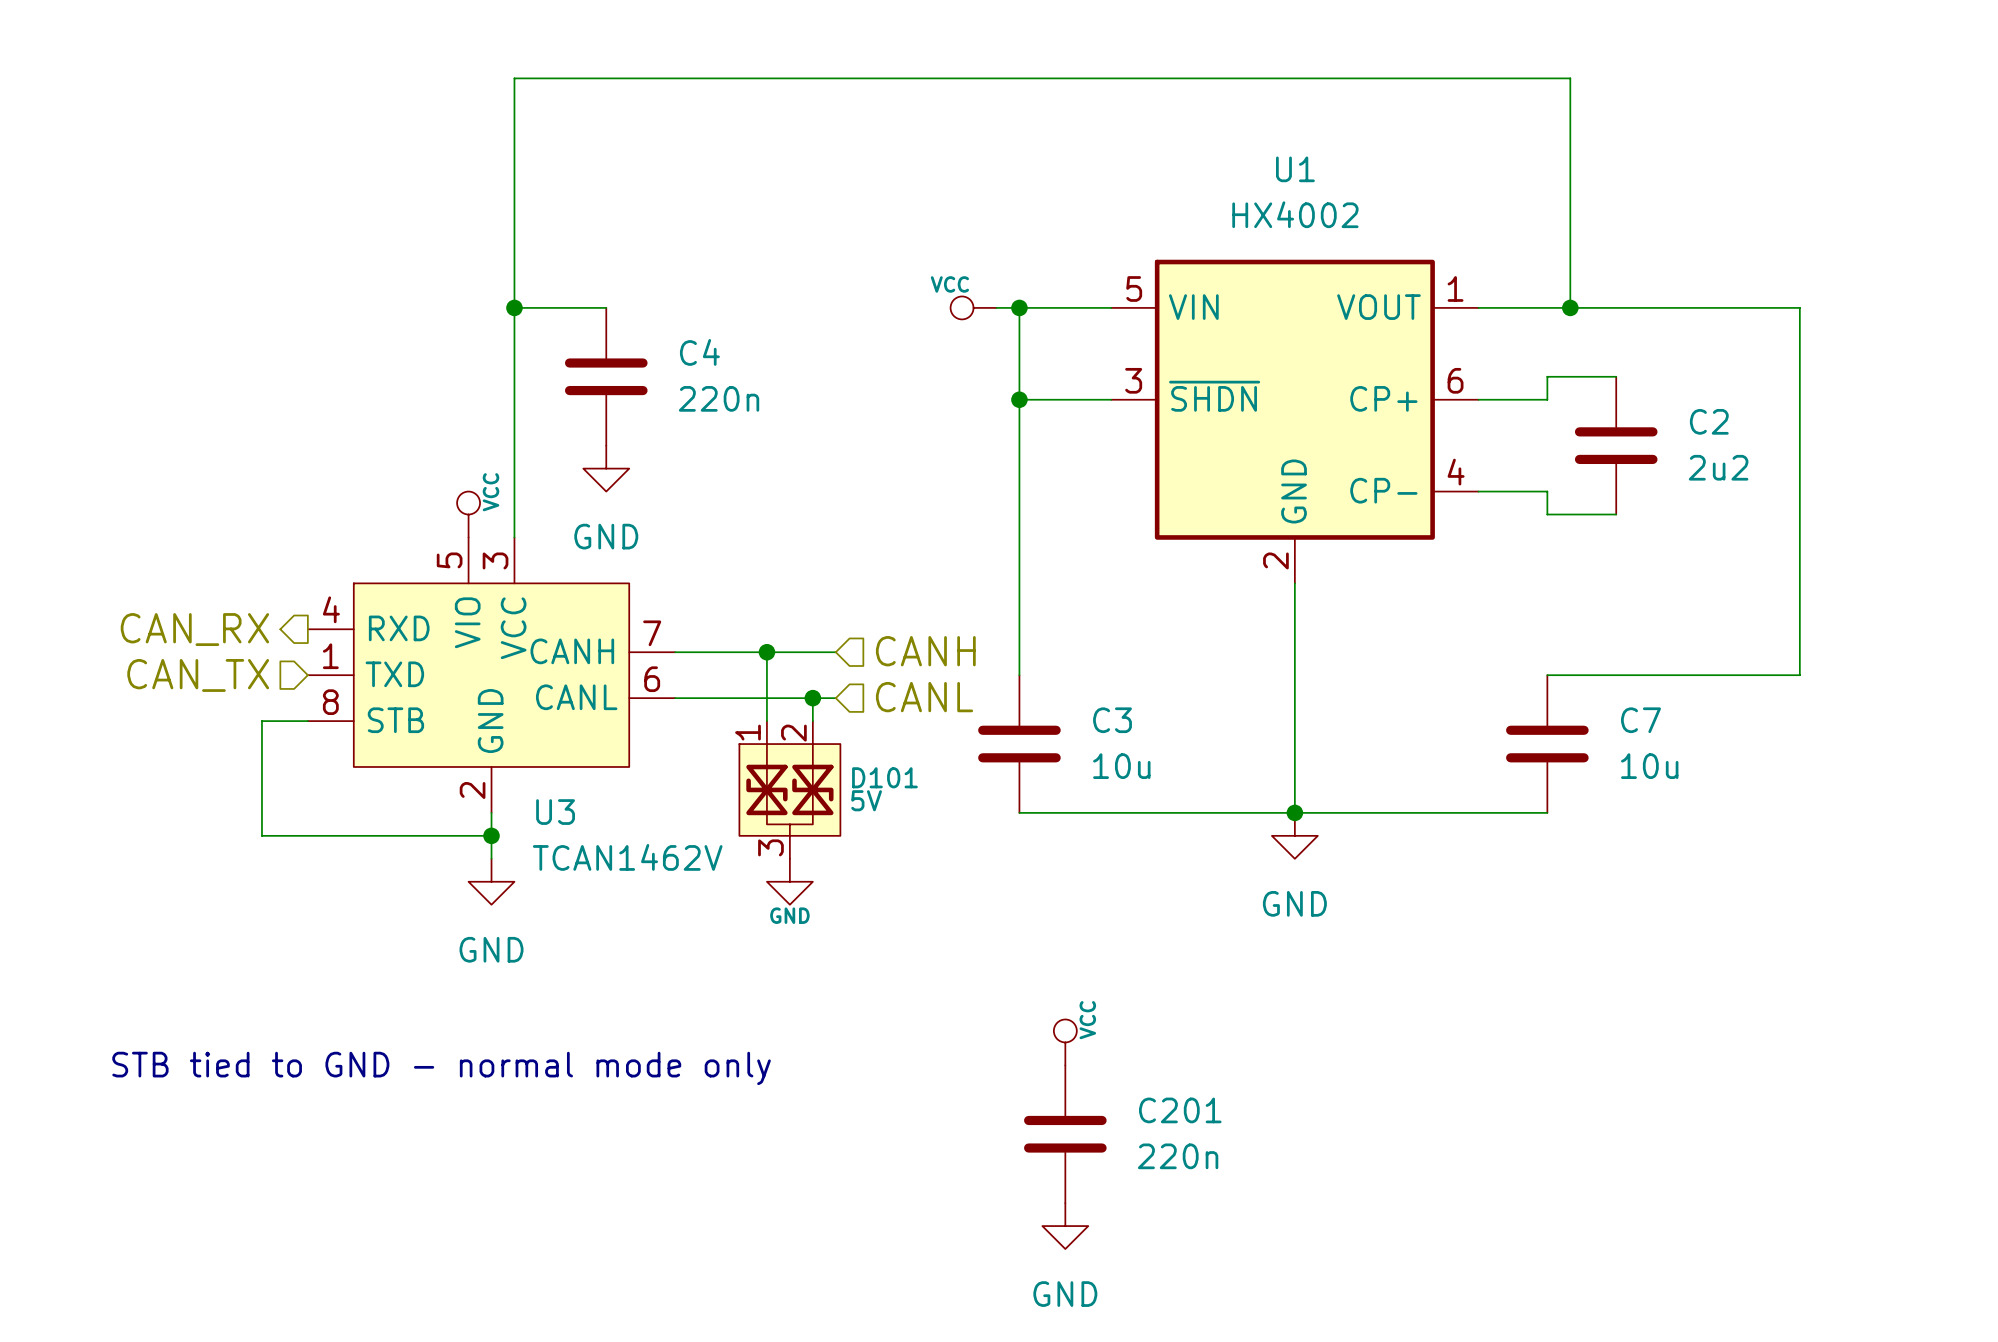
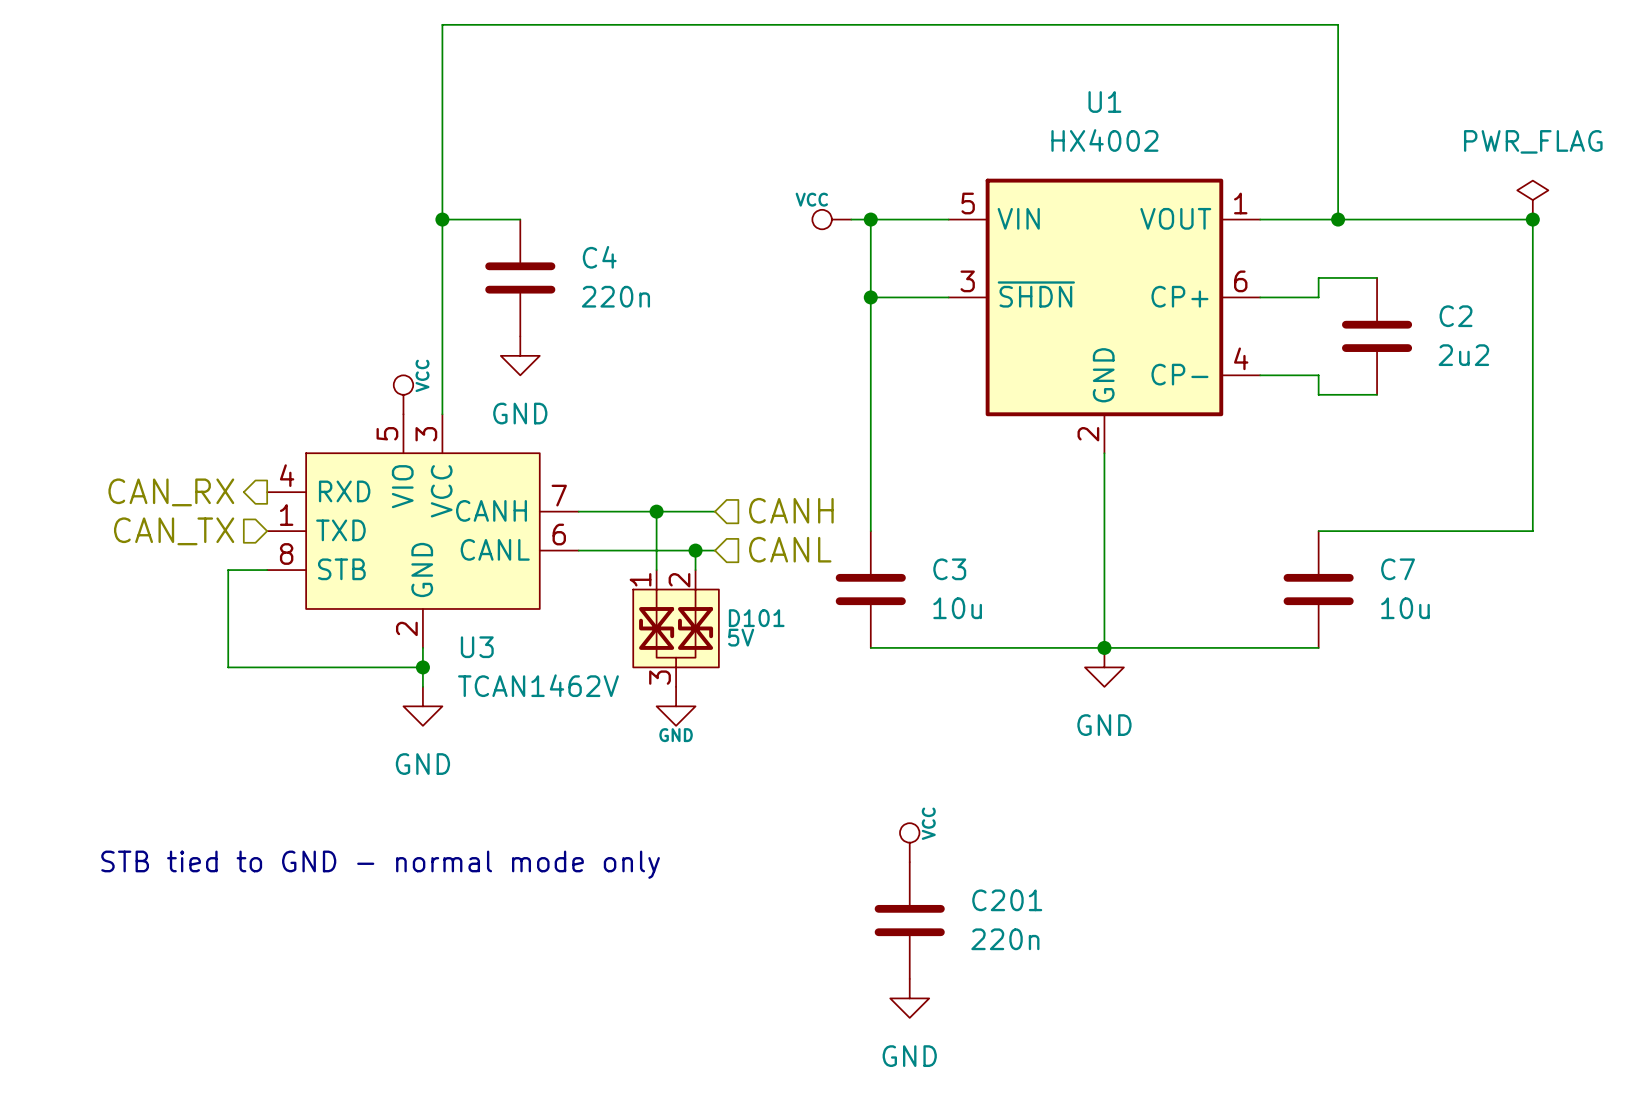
power symbol: none -> PWR_FLAG (1532, 200)
junction: none -> (1532, 219)

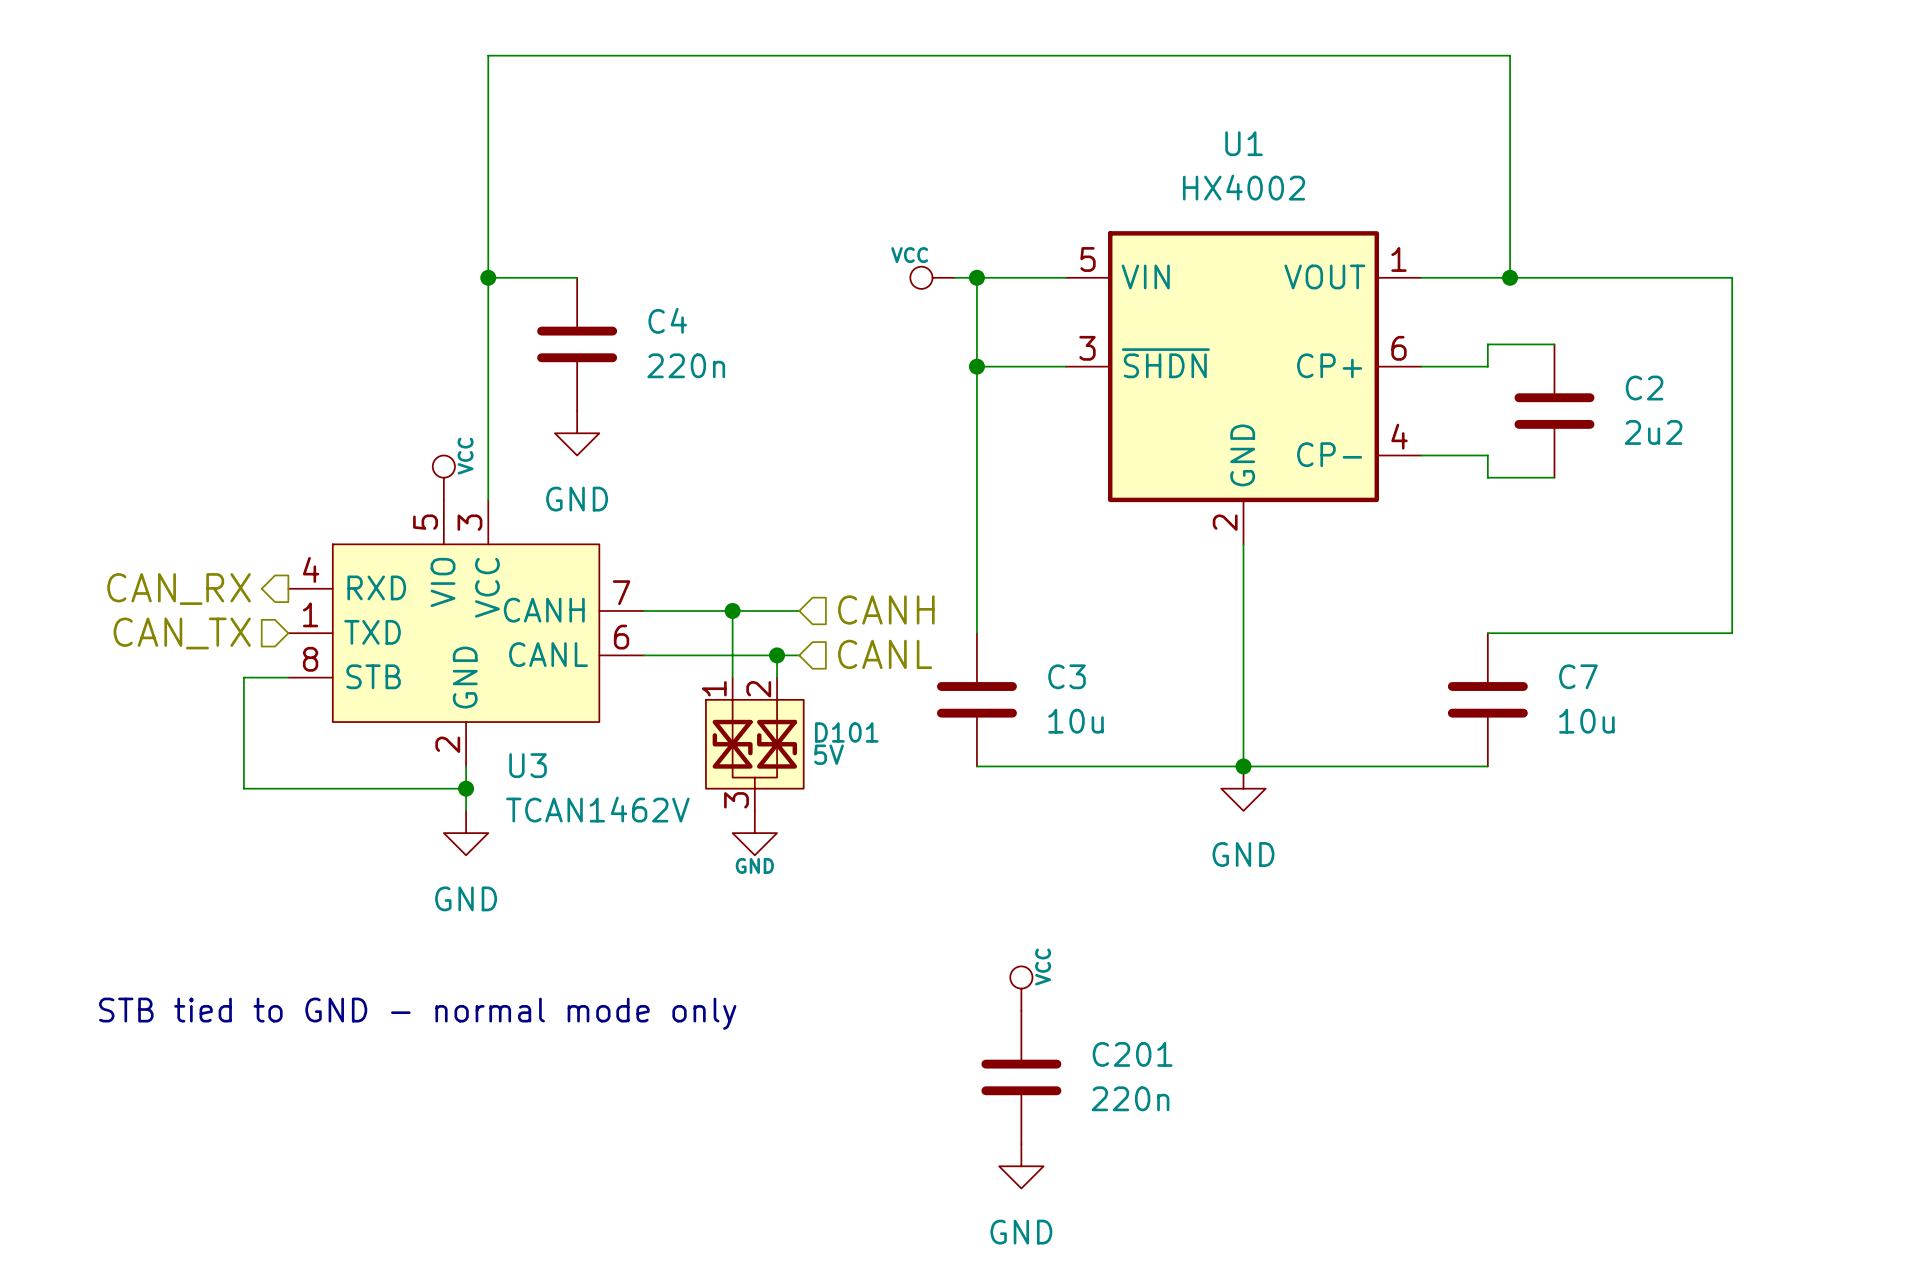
power symbol: PWR_FLAG (1532, 200) -> none
junction: (1532, 219) -> none

